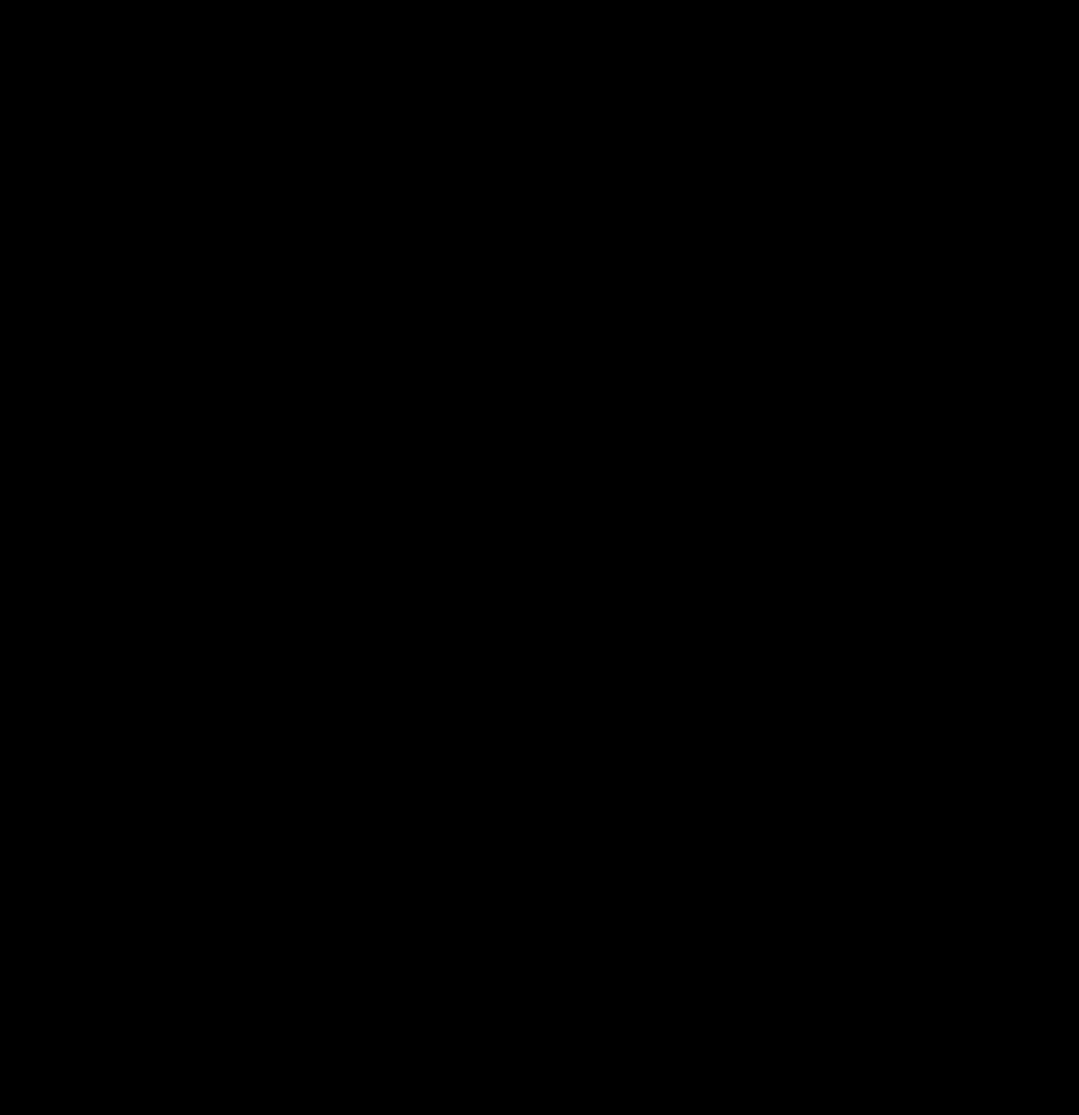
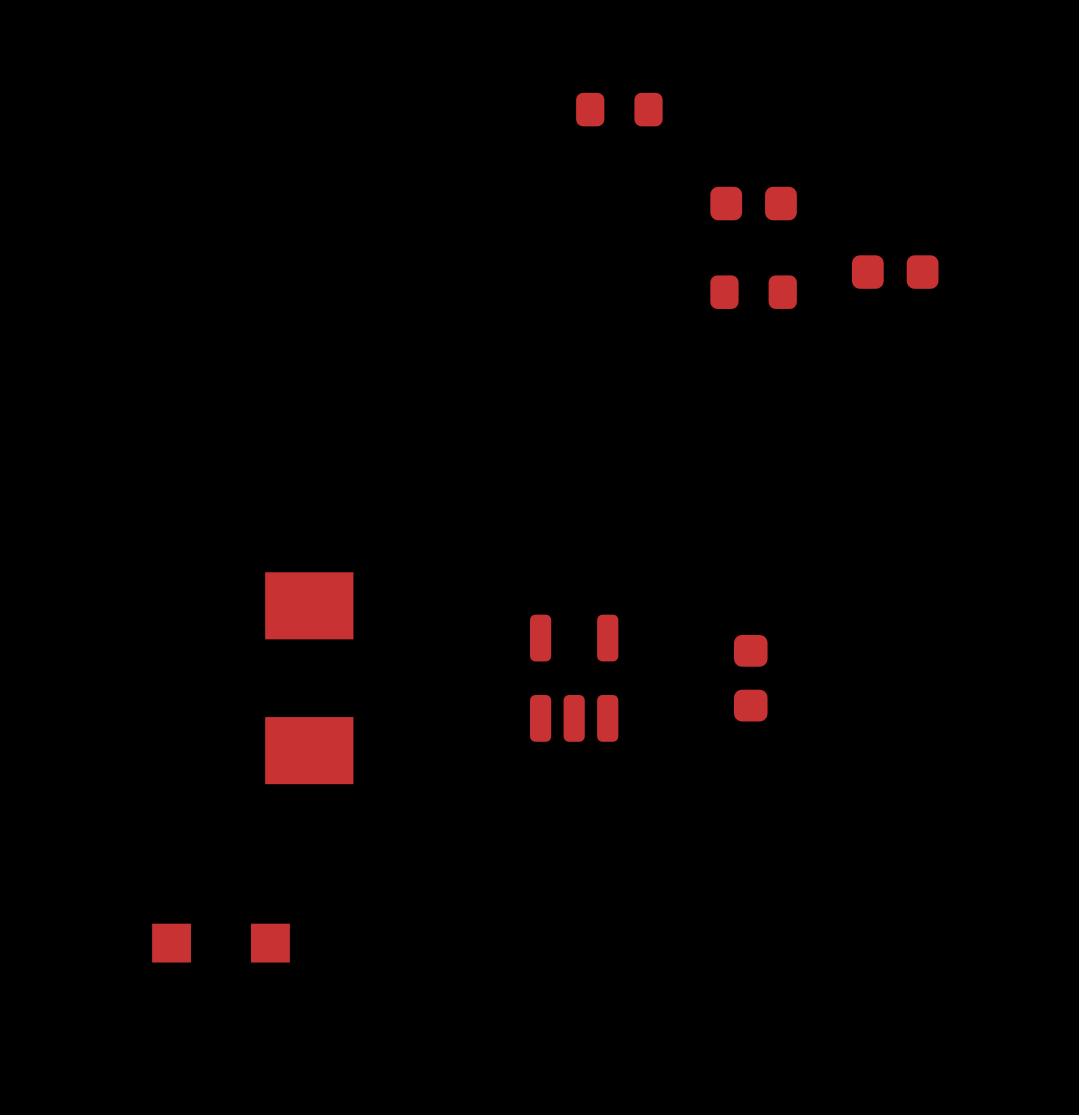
part: none -> (619, 109)
part: none -> (753, 203)
part: none -> (895, 272)
part: none -> (753, 292)
part: none -> (309, 678)
part: none -> (574, 678)
part: none -> (750, 678)
part: none -> (220, 943)

